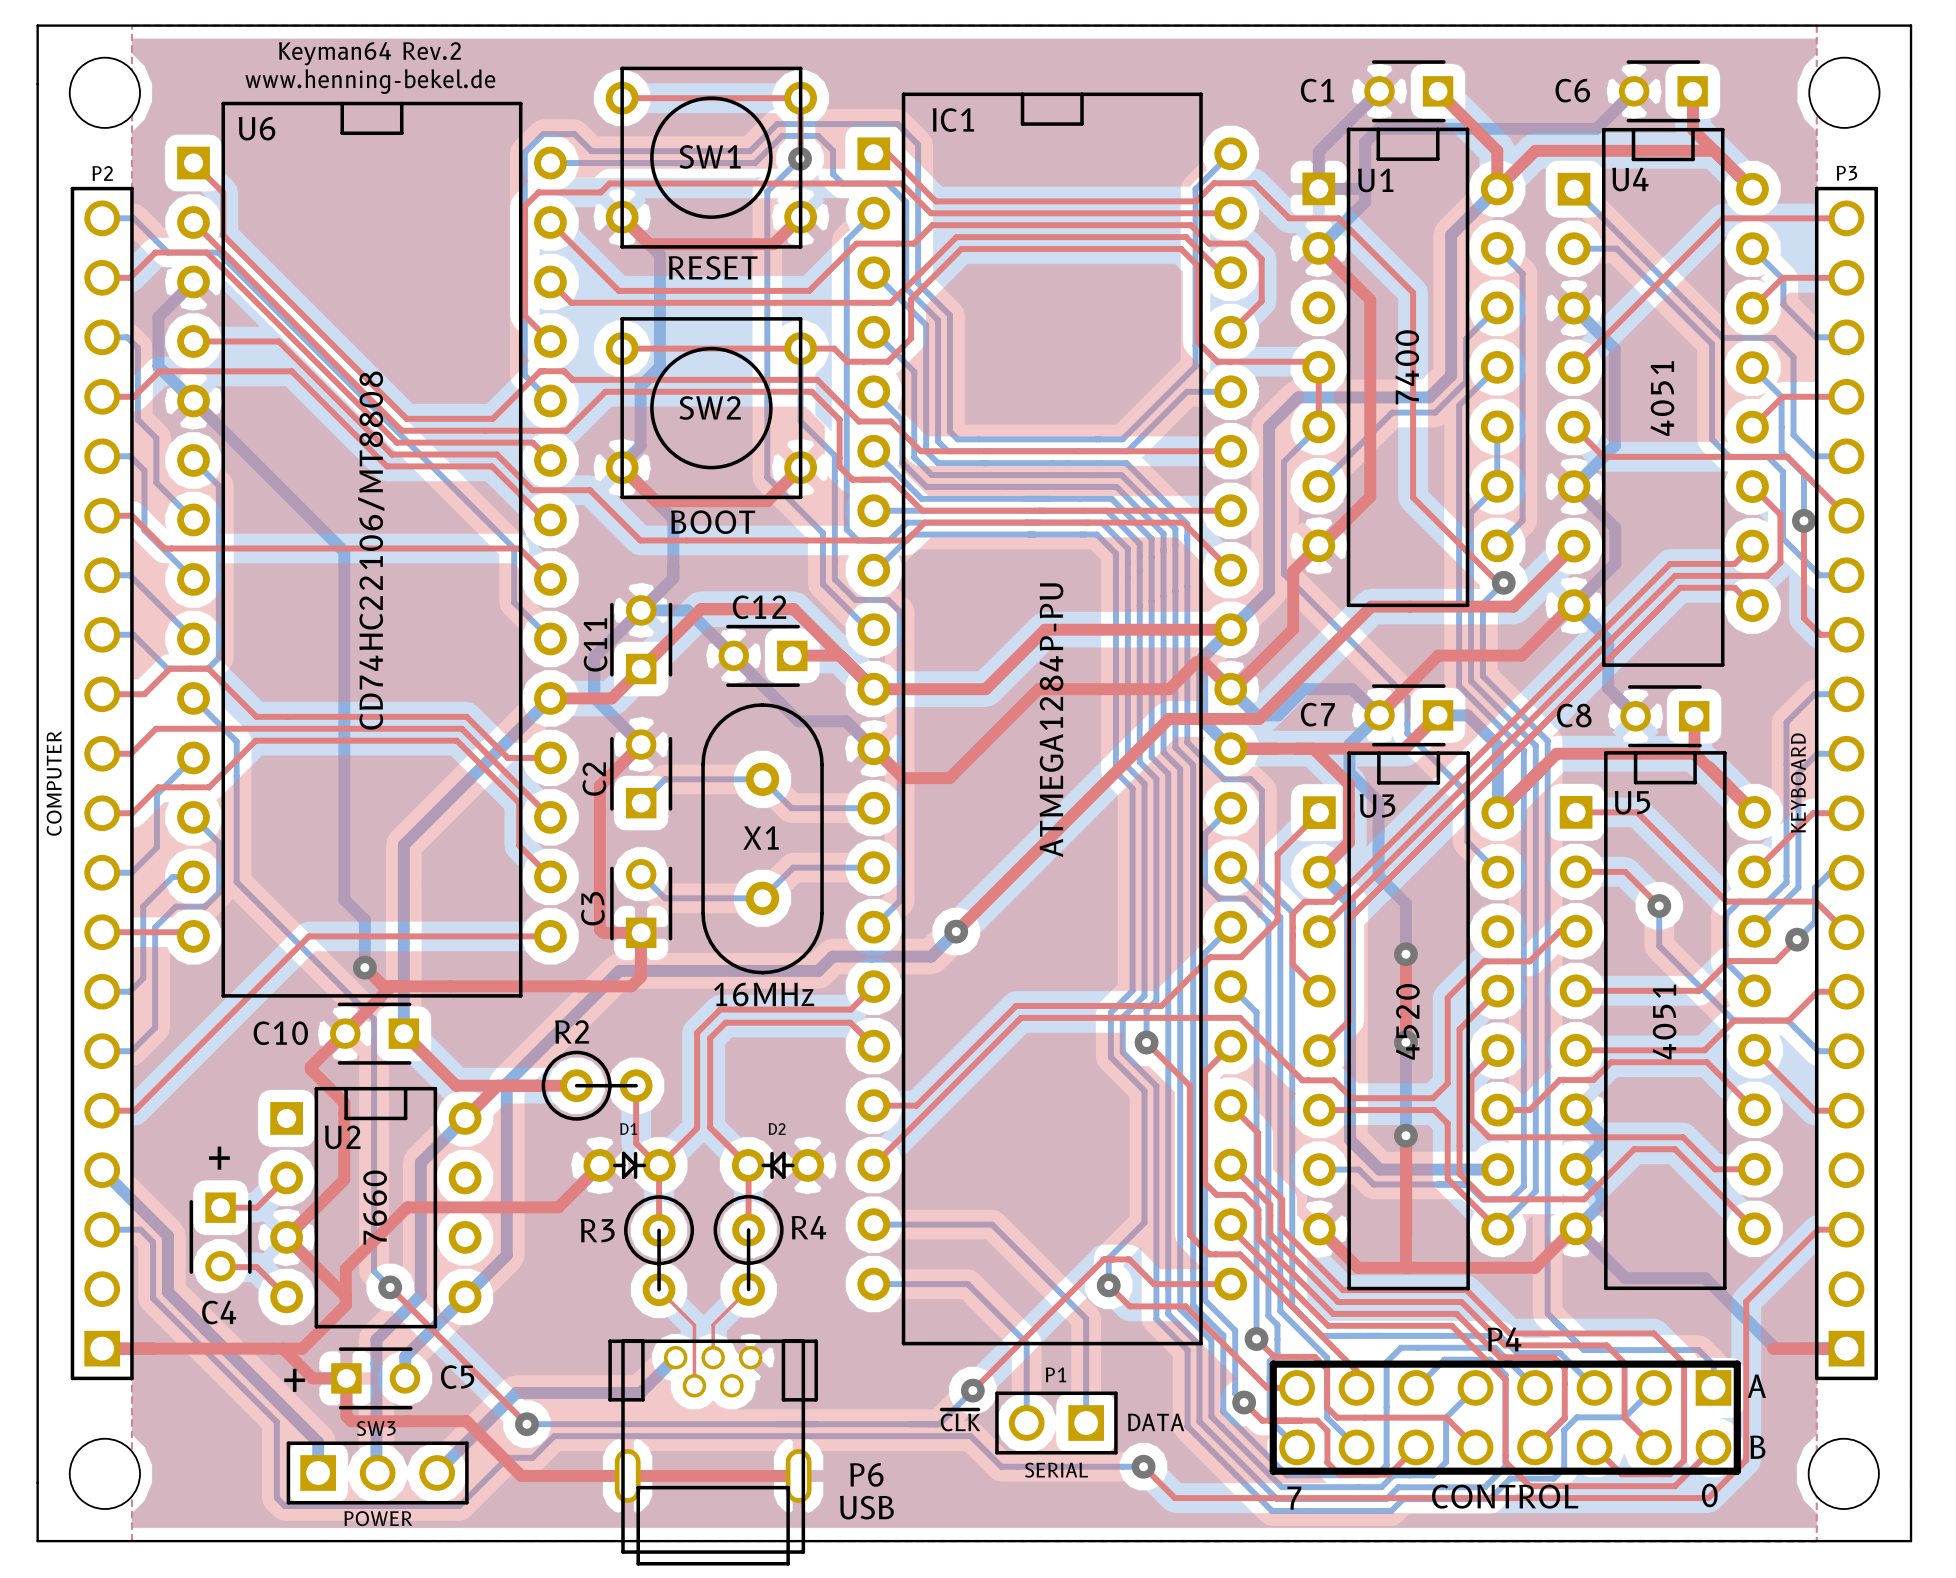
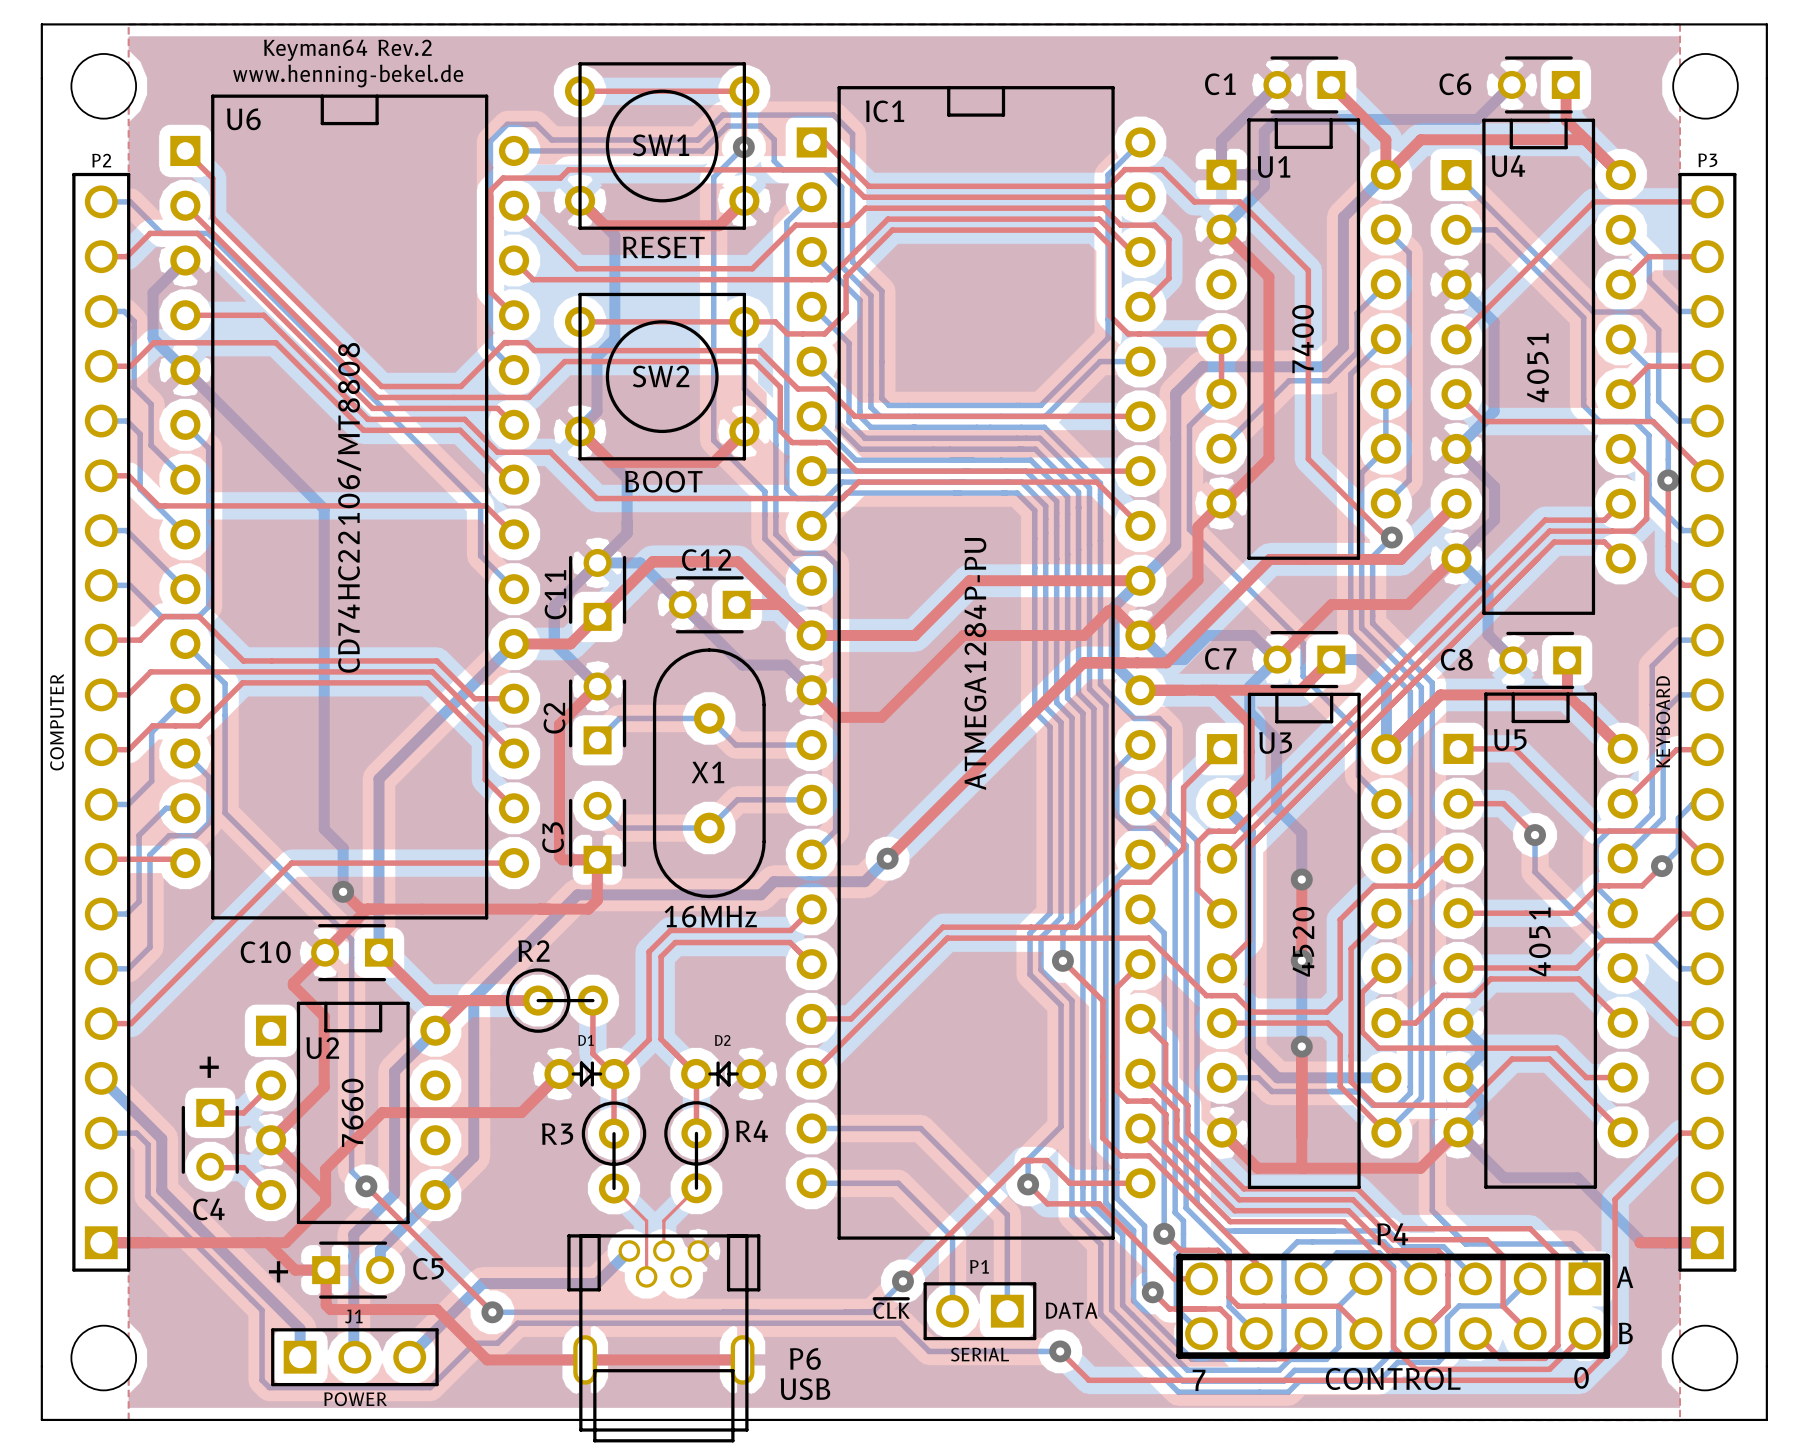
SW3 name: SW3 (376, 1428) -> J1 (353, 1316)

